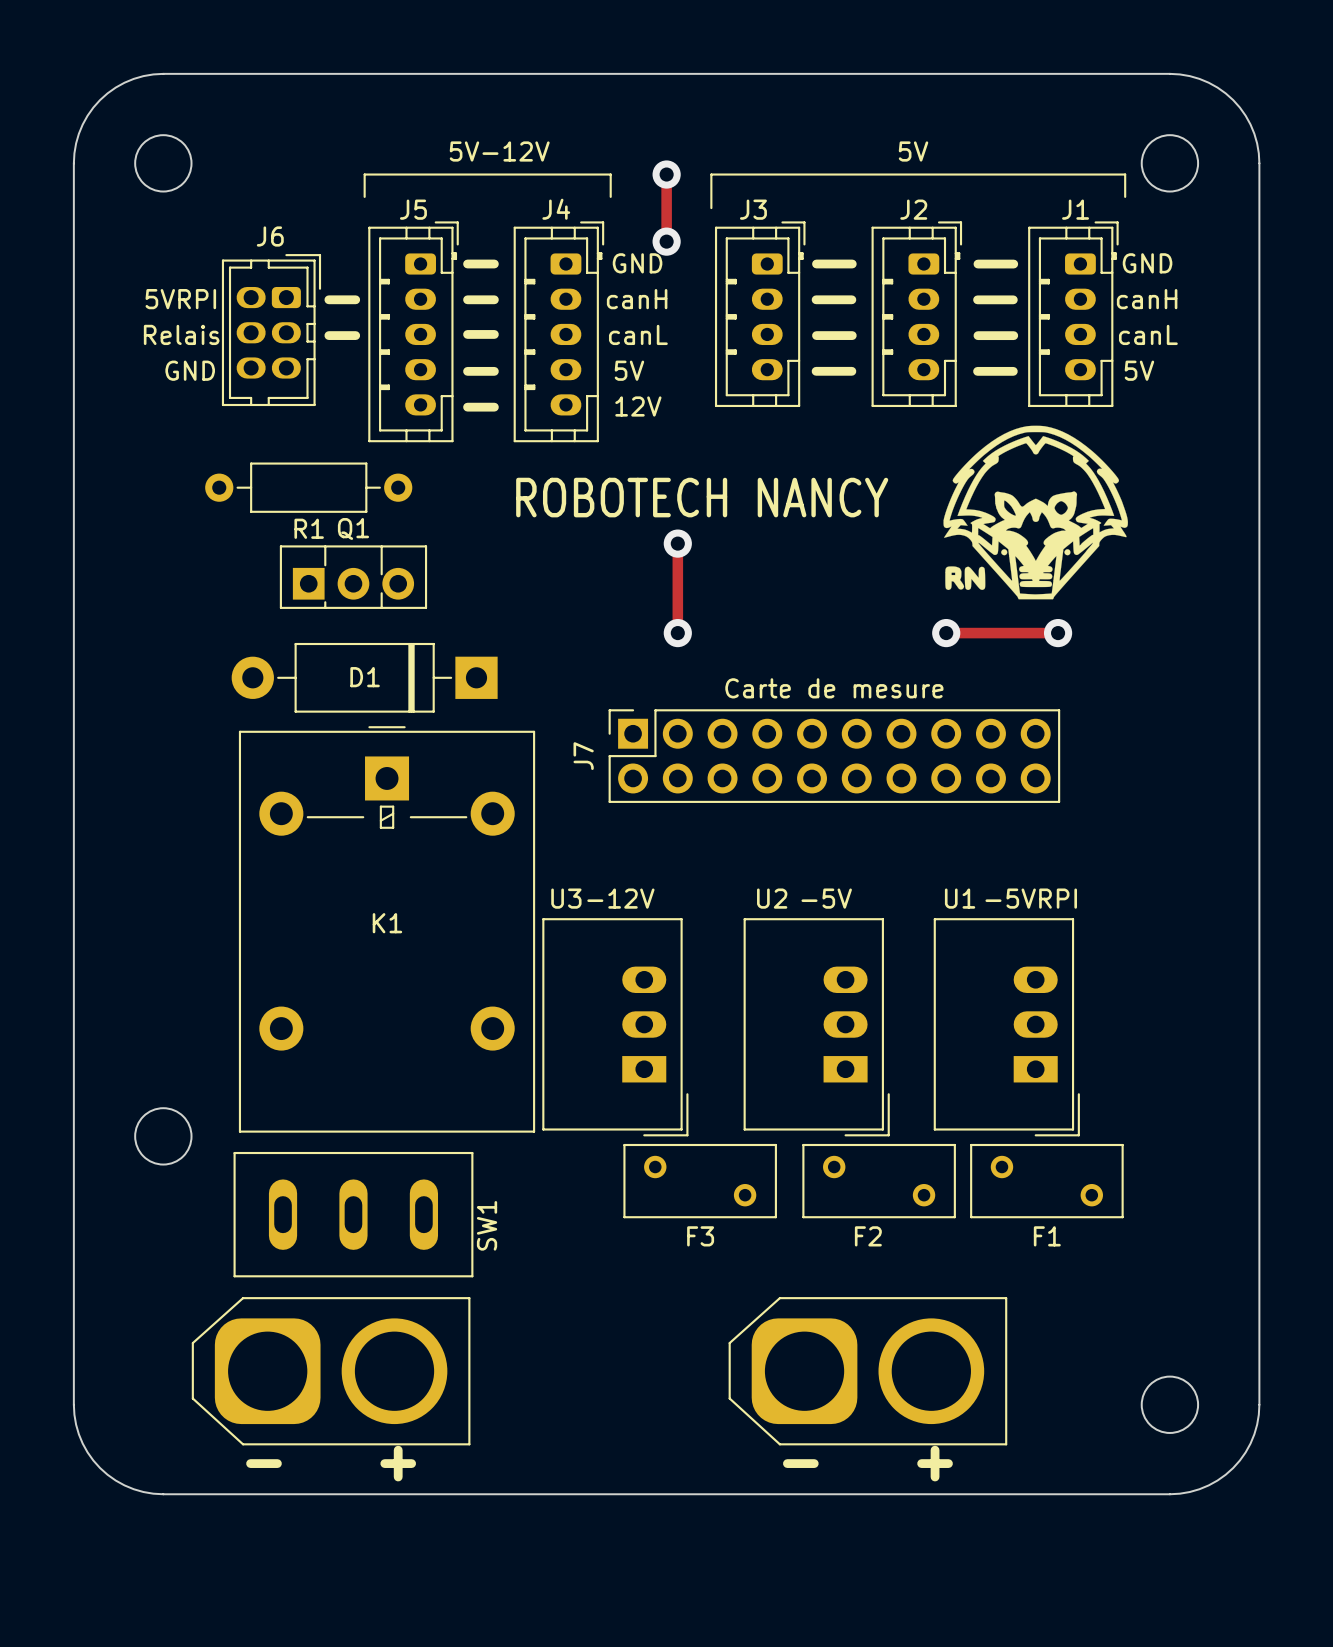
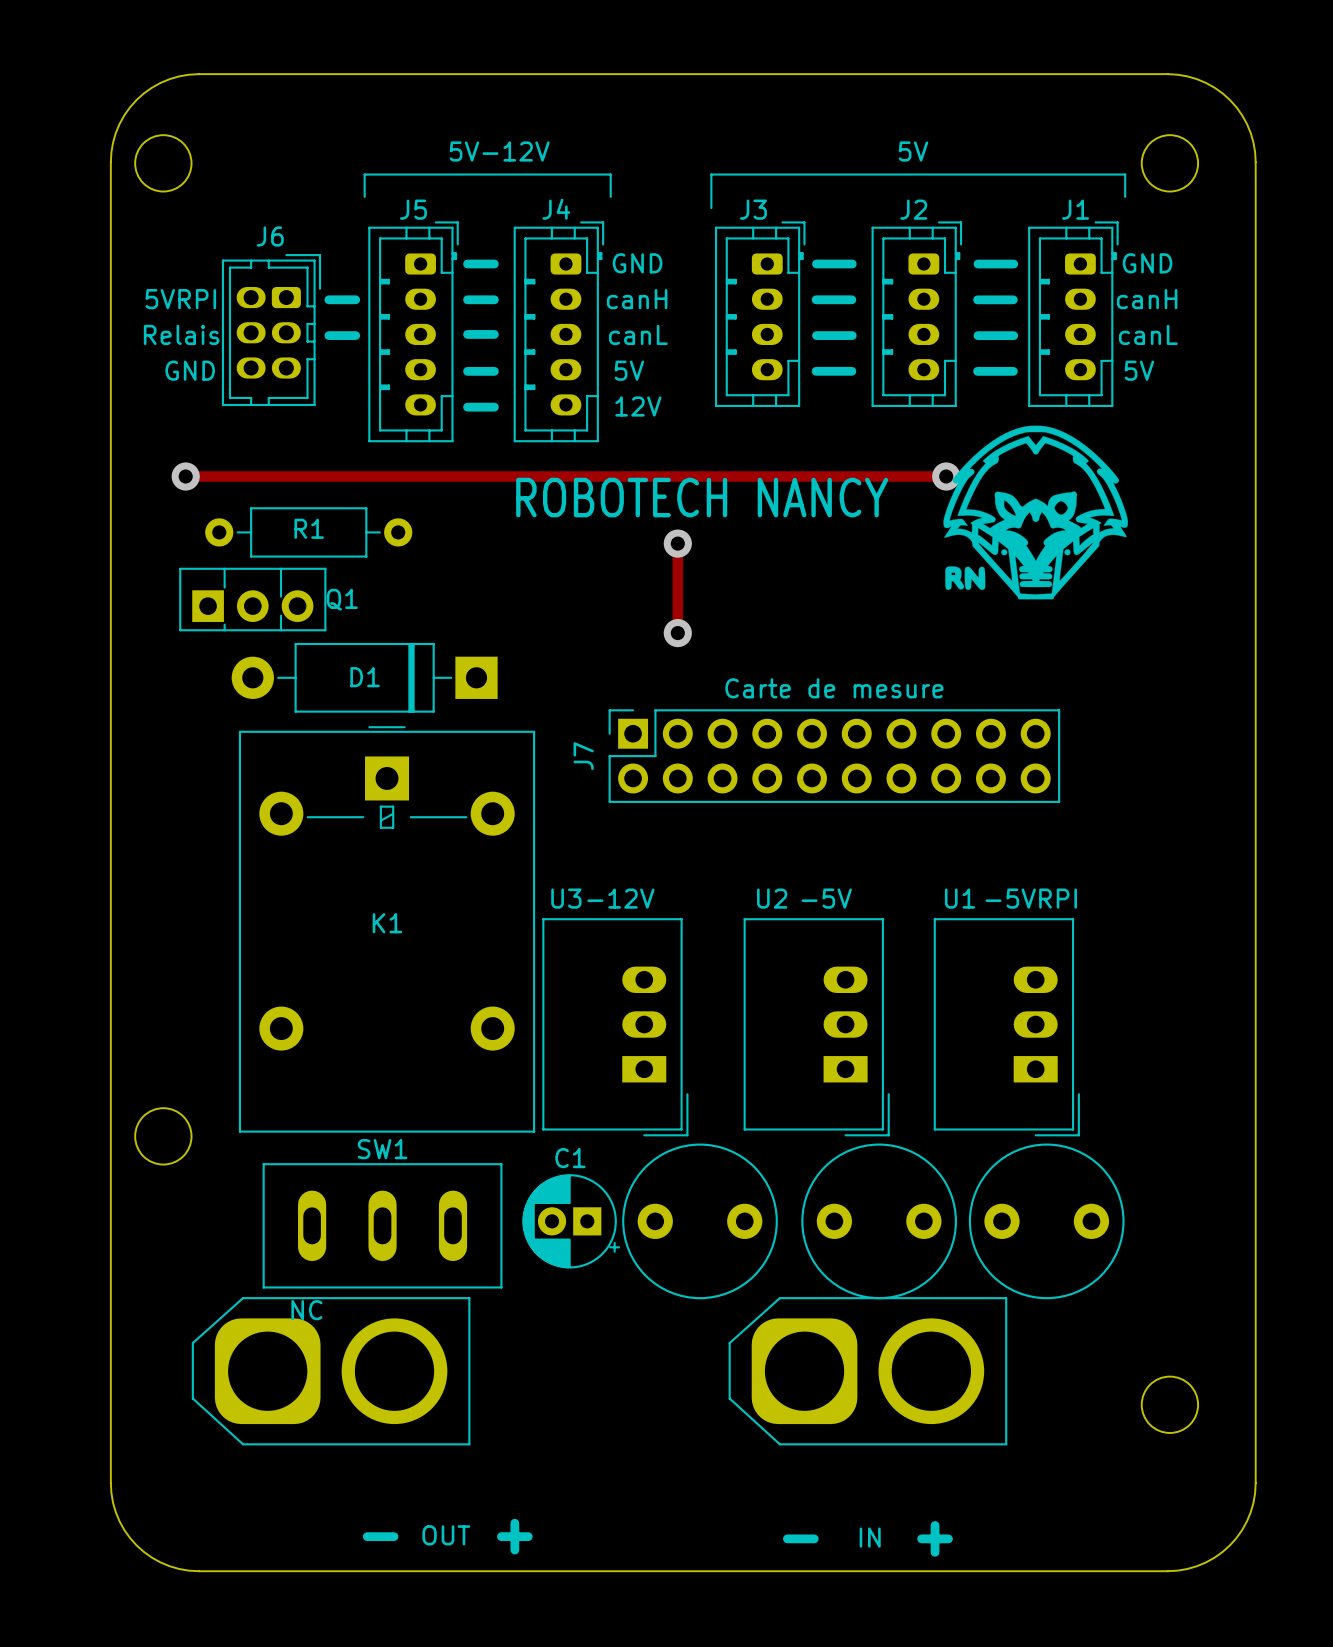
board edge: (163, 73) (1169, 73) (1189, 76) (1208, 82) (1225, 93) (1239, 107) (1254, 133) (1259, 163) (1259, 1404) (1257, 1424) (1250, 1443) (1239, 1460) (1225, 1474) (1199, 1489) (1169, 1494) (163, 1494) (143, 1492) (124, 1485) (107, 1474) (93, 1460) (78, 1434) (73, 1404) (73, 163) (78, 133) (87, 115) (100, 100) (115, 87) (133, 78) (163, 73) -> (198, 74) (169, 79) (152, 87) (136, 99) (124, 115) (115, 133) (110, 162) (110, 1483) (113, 1502) (124, 1530) (144, 1552) (160, 1562) (179, 1569) (198, 1571) (1167, 1571) (1196, 1566) (1214, 1557) (1236, 1538) (1246, 1521) (1253, 1502) (1255, 1483) (1255, 162) (1253, 142) (1242, 115) (1229, 99) (1214, 87) (1187, 76) (1167, 74) (198, 74)
track: (666, 174) (666, 241) -> none
via: (666, 174) -> none
via: (666, 241) -> none
track: none -> (185, 476) (946, 476)
via: none -> (185, 476)
via: none -> (946, 476)
R1 position: (308, 487) -> (308, 532)
Q1 name position: Q1 (353, 528) -> Q1 (342, 599)
Q1 position: (353, 577) -> (252, 599)
track: (946, 633) (1058, 633) -> none
via: (946, 633) -> none
via: (1058, 633) -> none
F3: (700, 1181) -> none
F2: (879, 1181) -> none
F1: (1046, 1181) -> none
SW1 position: (353, 1214) -> (382, 1225)
C1: none -> (571, 1221)
part: none -> (700, 1221)
part: none -> (879, 1221)
part: none -> (1046, 1221)
SW1 name rotation: 0° (487, 1225) -> 90° clockwise (382, 1149)
SW1 name position: SW1 (487, 1225) -> SW1 (382, 1149)
text: none -> NC (306, 1310)
text position: - (264, 1463) -> - (380, 1536)
text position: + (398, 1463) -> + (514, 1536)
text position: - (800, 1463) -> - (800, 1538)
text position: + (935, 1463) -> + (935, 1538)
text: none -> OUT (446, 1535)
text: none -> IN (870, 1537)

